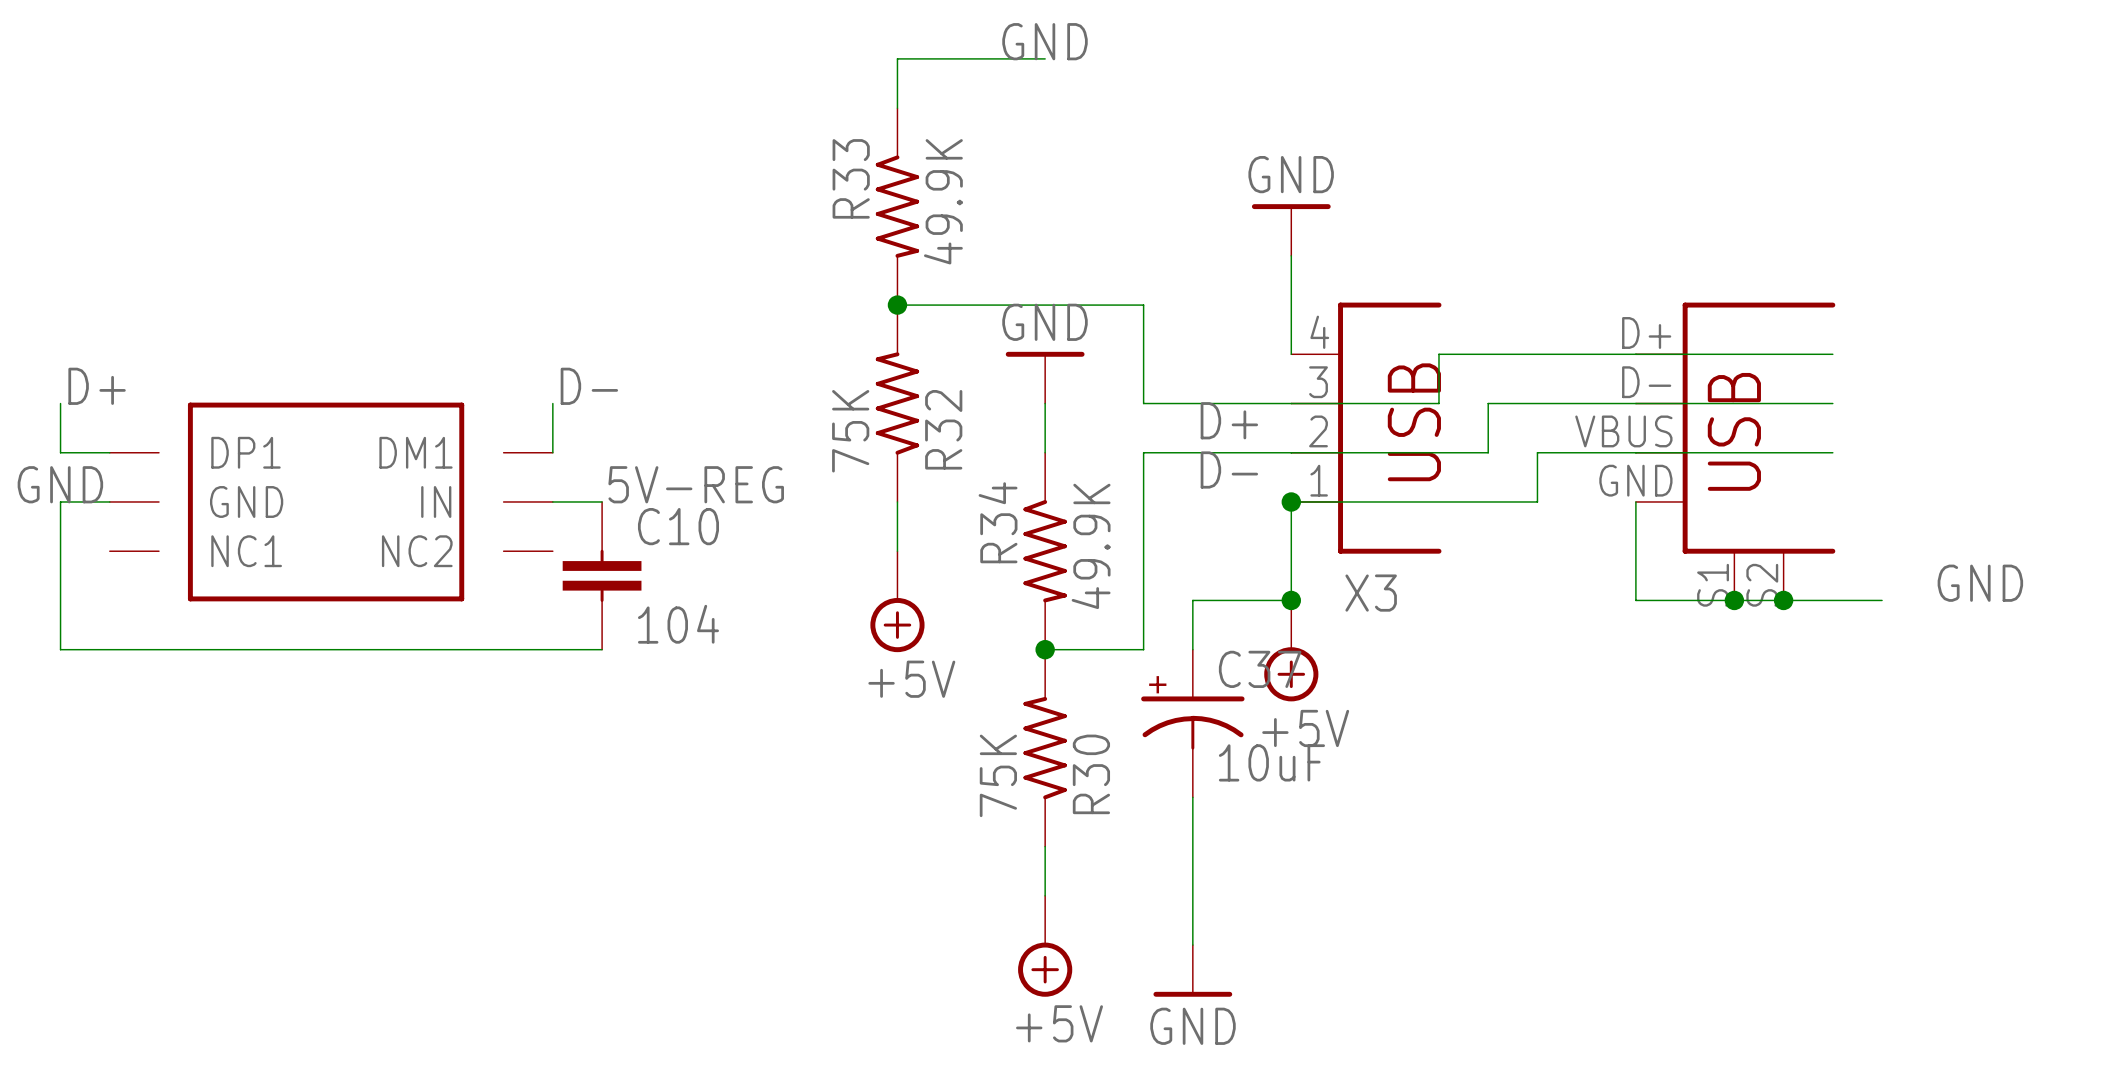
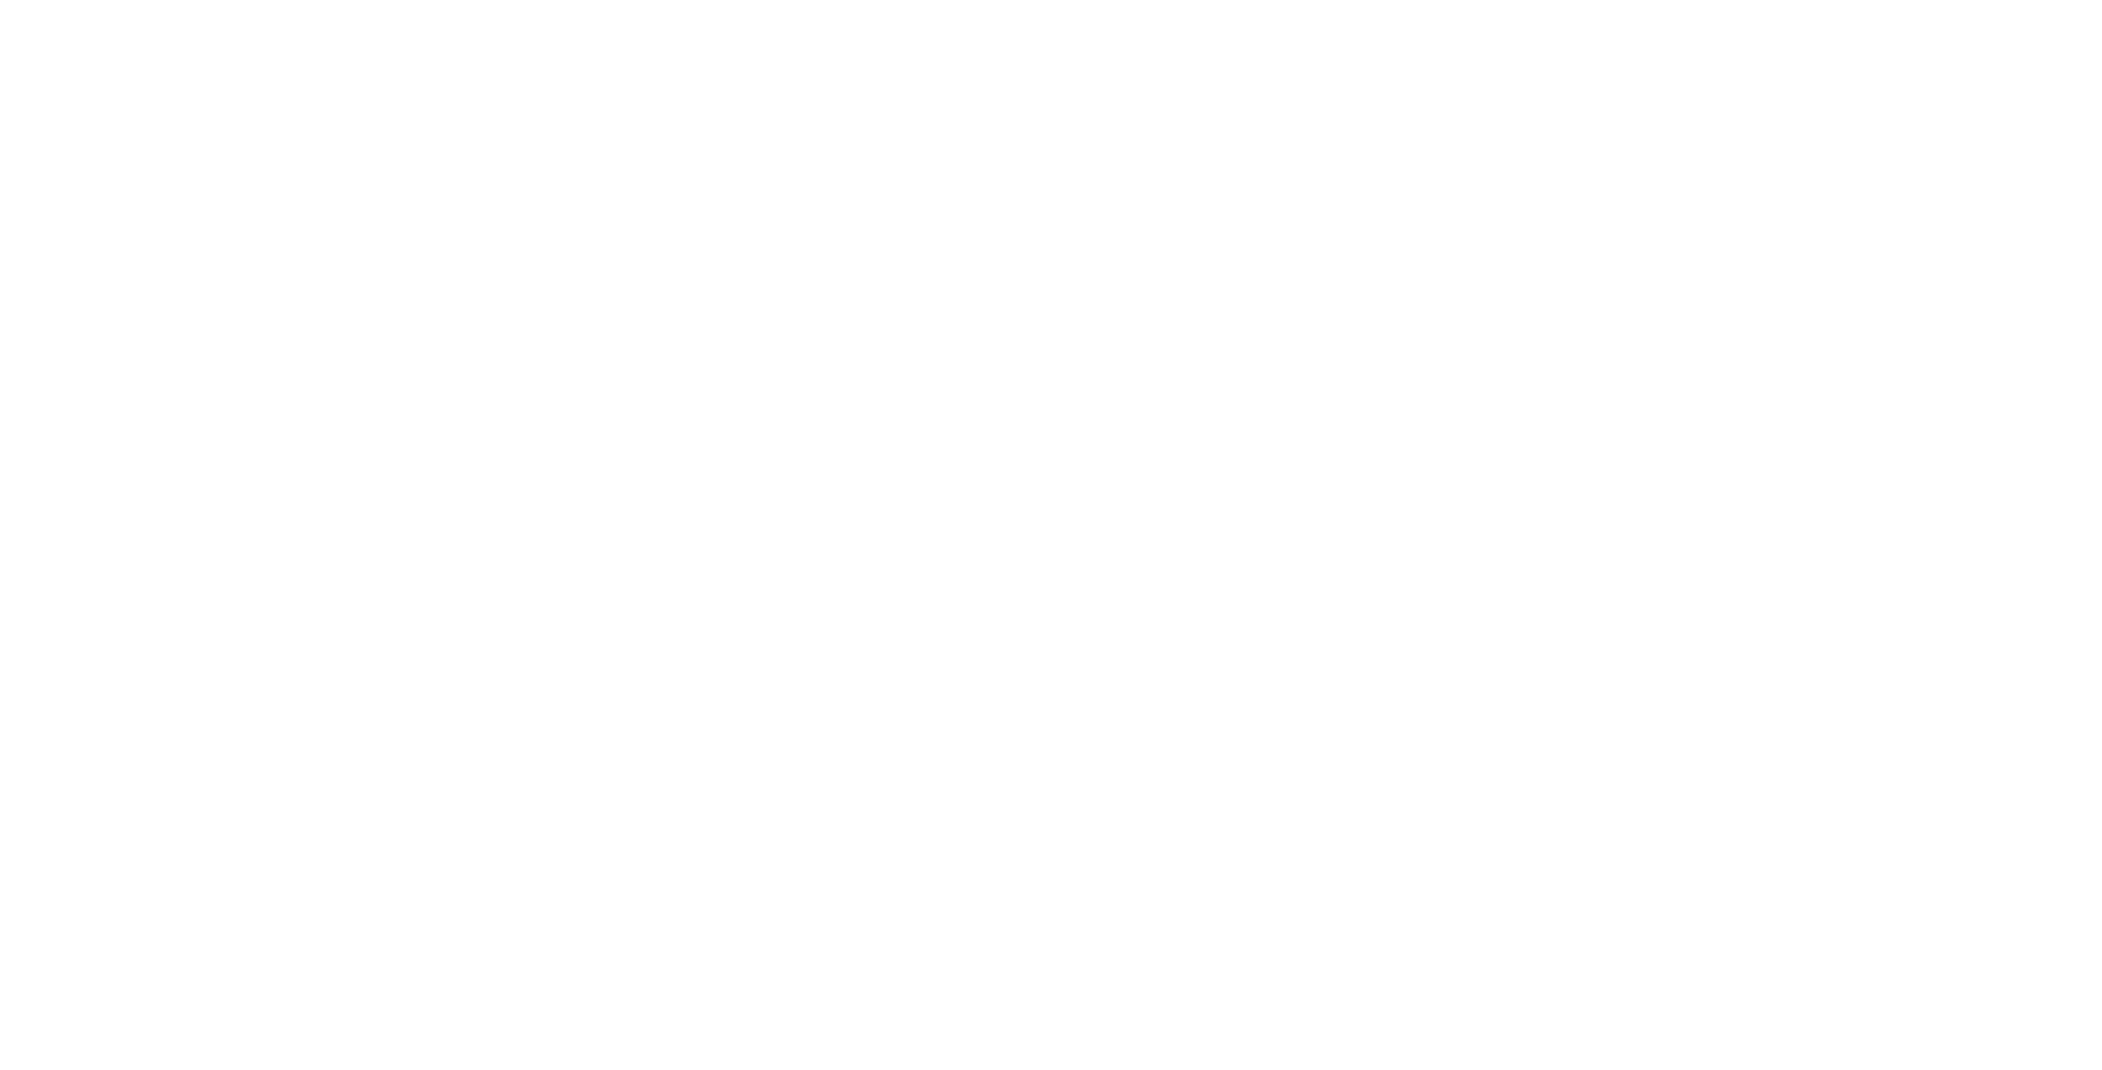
label: GND (1044, 41) -> none
wire: (1045, 58) (897, 58) (897, 108) -> none
R33: 49.9K (897, 206) -> none
power symbol: GND (1291, 229) -> none
wire: (1291, 255) (1291, 354) -> none
wire: (897, 305) (1143, 305) (1143, 403) (1438, 403) (1438, 354) (1832, 354) -> none
junction: (897, 305) -> none
power symbol: GND (1045, 377) -> none
label: D+ (97, 386) -> none
label: D- (589, 386) -> none
wire: (60, 403) (60, 452) (109, 452) -> none
wire: (552, 403) (552, 452) -> none
R32: 75K (897, 403) -> none
wire: (1045, 403) (1045, 452) -> none
wire: (1832, 403) (1488, 403) (1488, 452) (1143, 452) (1143, 649) (1045, 649) -> none
label: D+ (1229, 420) -> none
X3: (1366, 428) -> none
part: (1735, 451) -> none
wire: (1832, 452) (1537, 452) (1537, 501) (1291, 501) (1291, 600) (1192, 600) (1192, 649) -> none
label: D- (1229, 469) -> none
label: GND (60, 484) -> none
label: 5V-REG (696, 484) -> none
wire: (109, 501) (60, 501) (60, 649) (602, 649) -> none
part: (331, 501) -> none
wire: (552, 501) (602, 501) -> none
wire: (897, 501) (897, 551) -> none
junction: (1291, 501) -> none
wire: (1635, 501) (1635, 600) (1882, 600) -> none
R34: 49.9K (1045, 551) -> none
C10: 104 (602, 575) -> none
label: GND (1980, 583) -> none
junction: (1291, 600) -> none
junction: (1734, 600) -> none
junction: (1783, 600) -> none
power symbol: +5V (897, 601) -> none
junction: (1045, 649) -> none
power symbol: +5V (1291, 650) -> none
C37: 10uF (1192, 723) -> none
R30: 75K (1045, 748) -> none
wire: (1192, 797) (1192, 945) -> none
wire: (1045, 846) (1045, 895) -> none
power symbol: +5V (1045, 946) -> none
power symbol: GND (1192, 970) -> none

